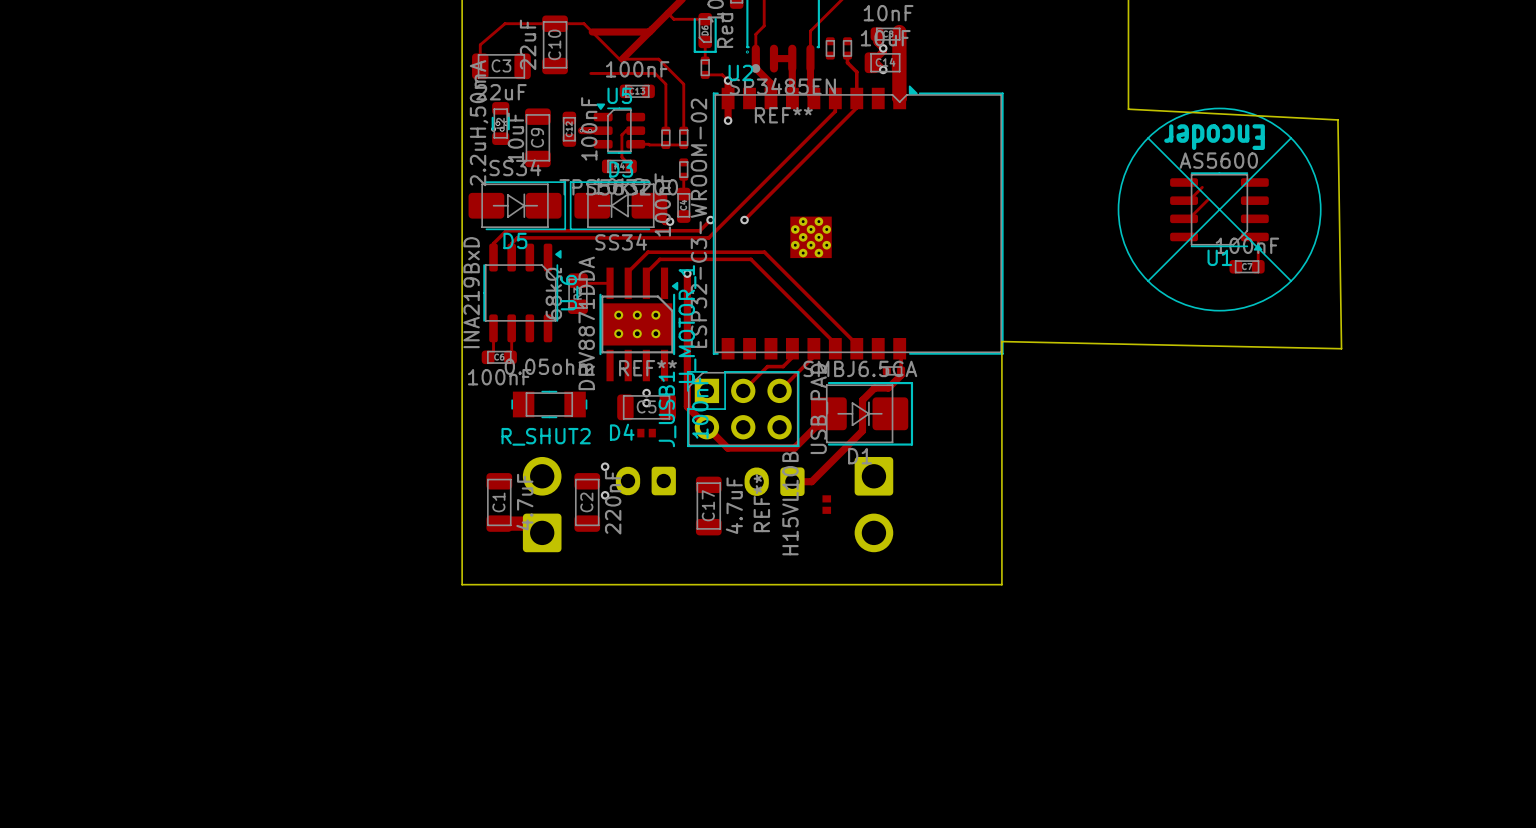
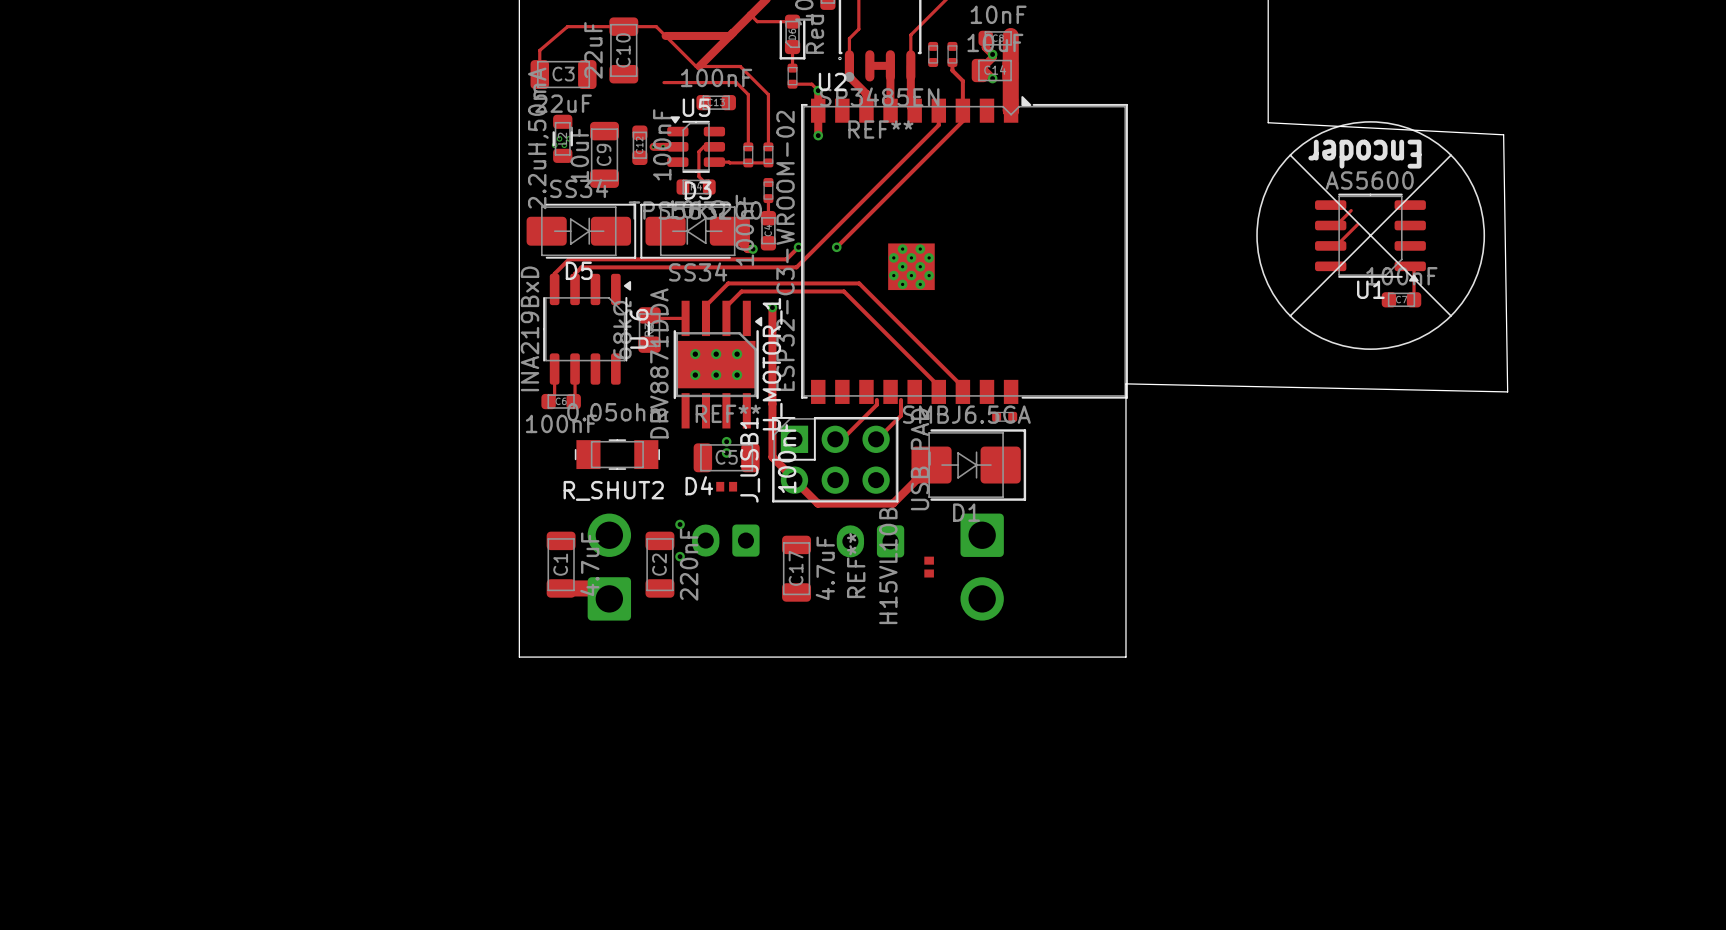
track: (792, 348) (792, 357) (783, 366) (767, 366) (743, 390) -> none
track: (813, 348) (813, 356) (779, 390) -> none
track: (899, 348) (901, 375) (888, 388) (874, 388) (862, 400) (862, 430) (811, 481) (792, 481) -> none
track: none -> (876, 399) (876, 404) (842, 439) (836, 439)
track: none -> (901, 399) (901, 415) (877, 439)

